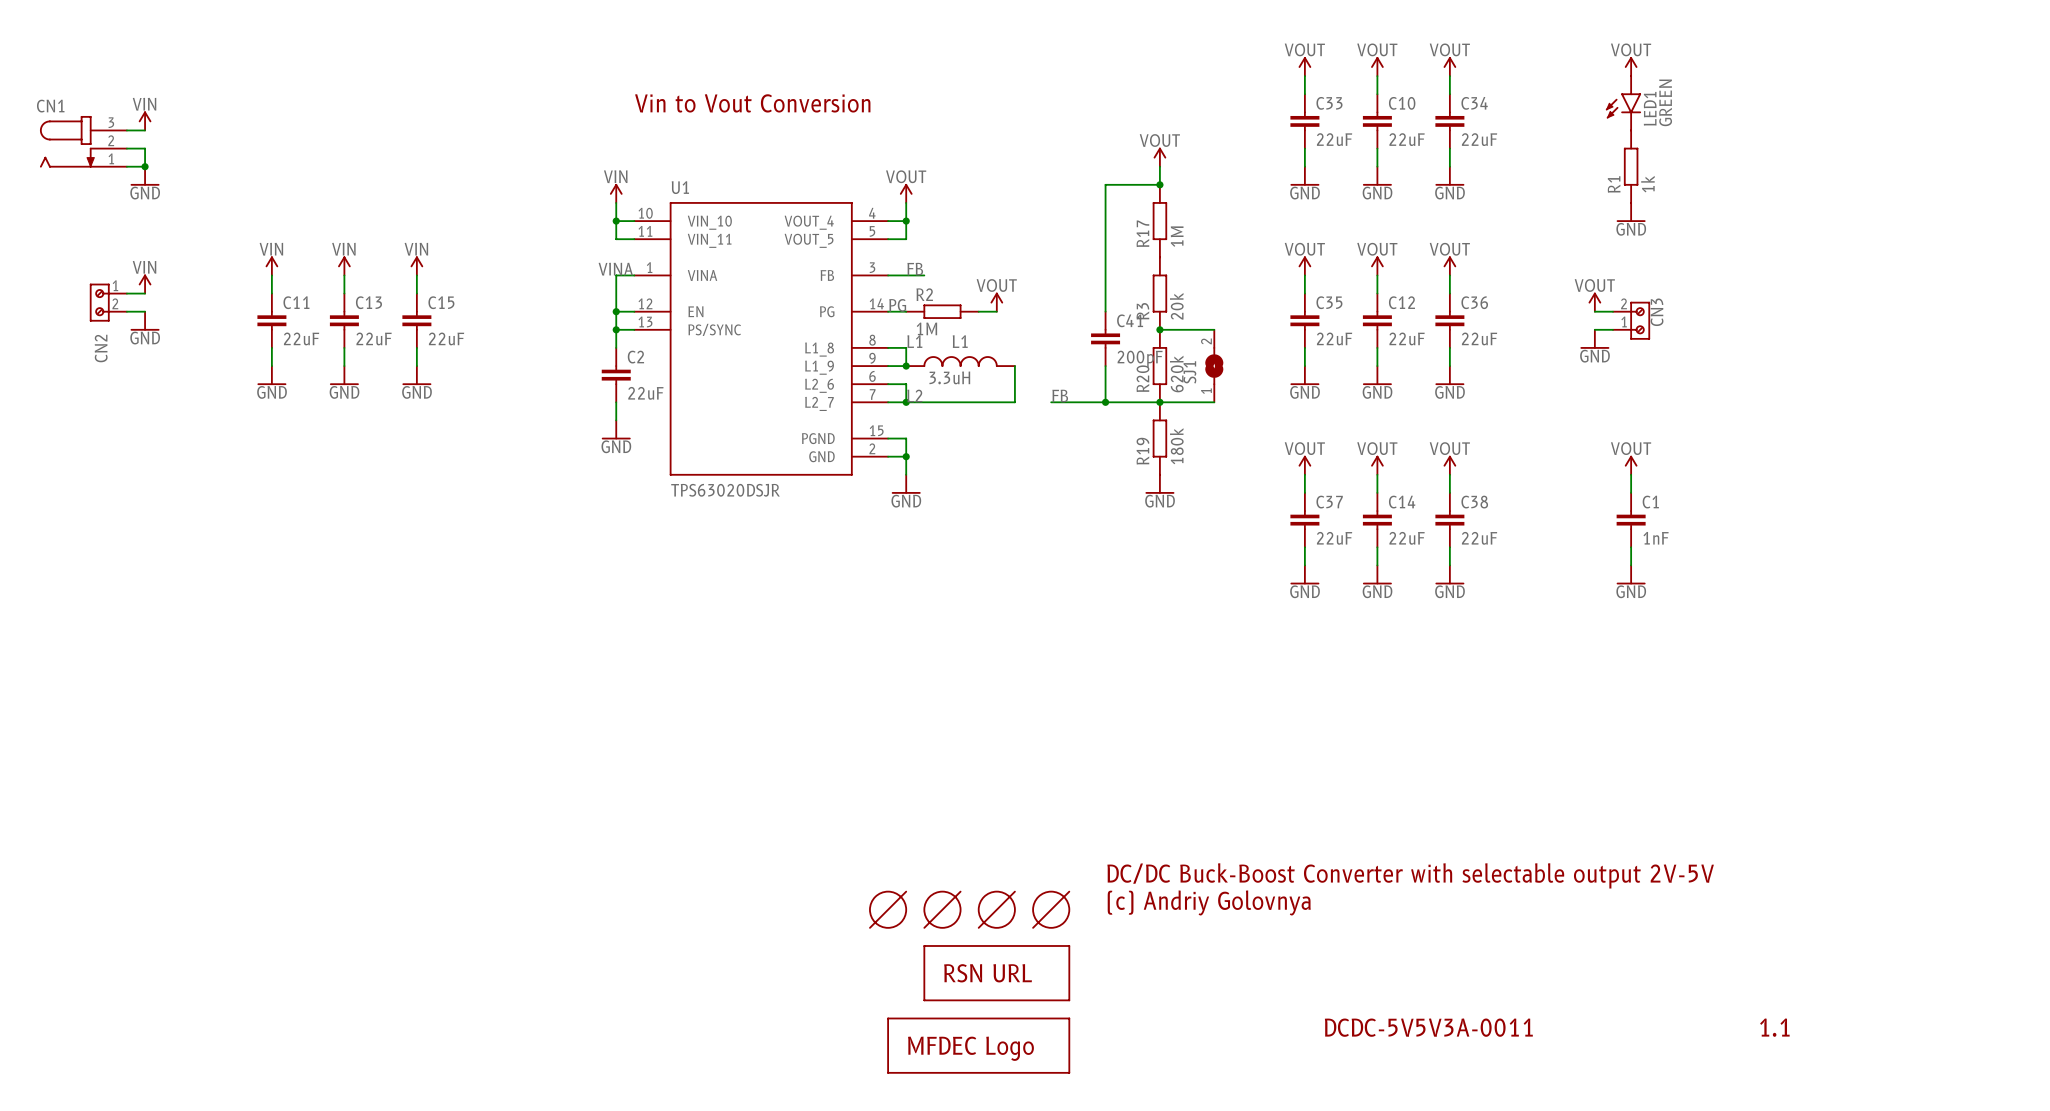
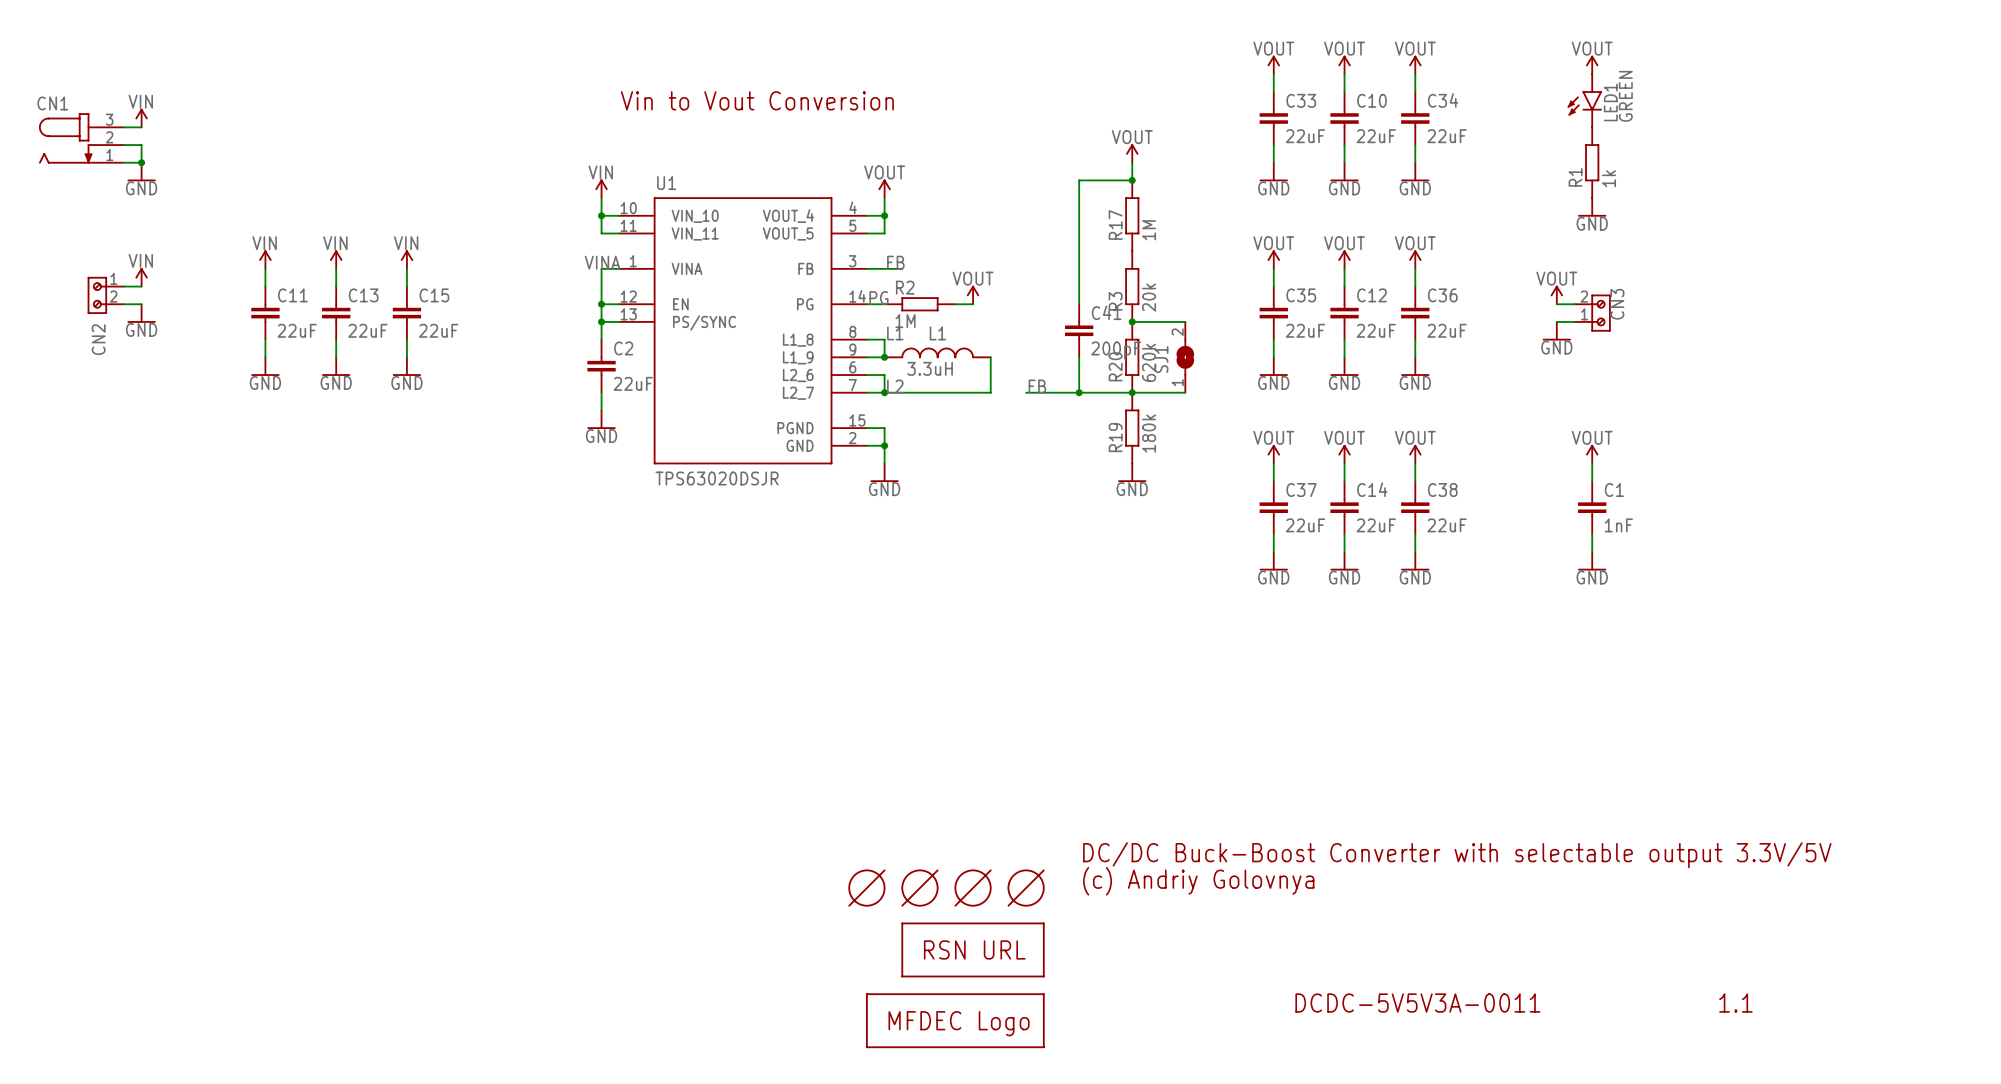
text: DC/DC Buck-Boost Converter with selectable output 2V-5V (1410, 875) -> DC/DC Buck-Boost Converter with selectable output 3.3V/5V (1457, 855)

